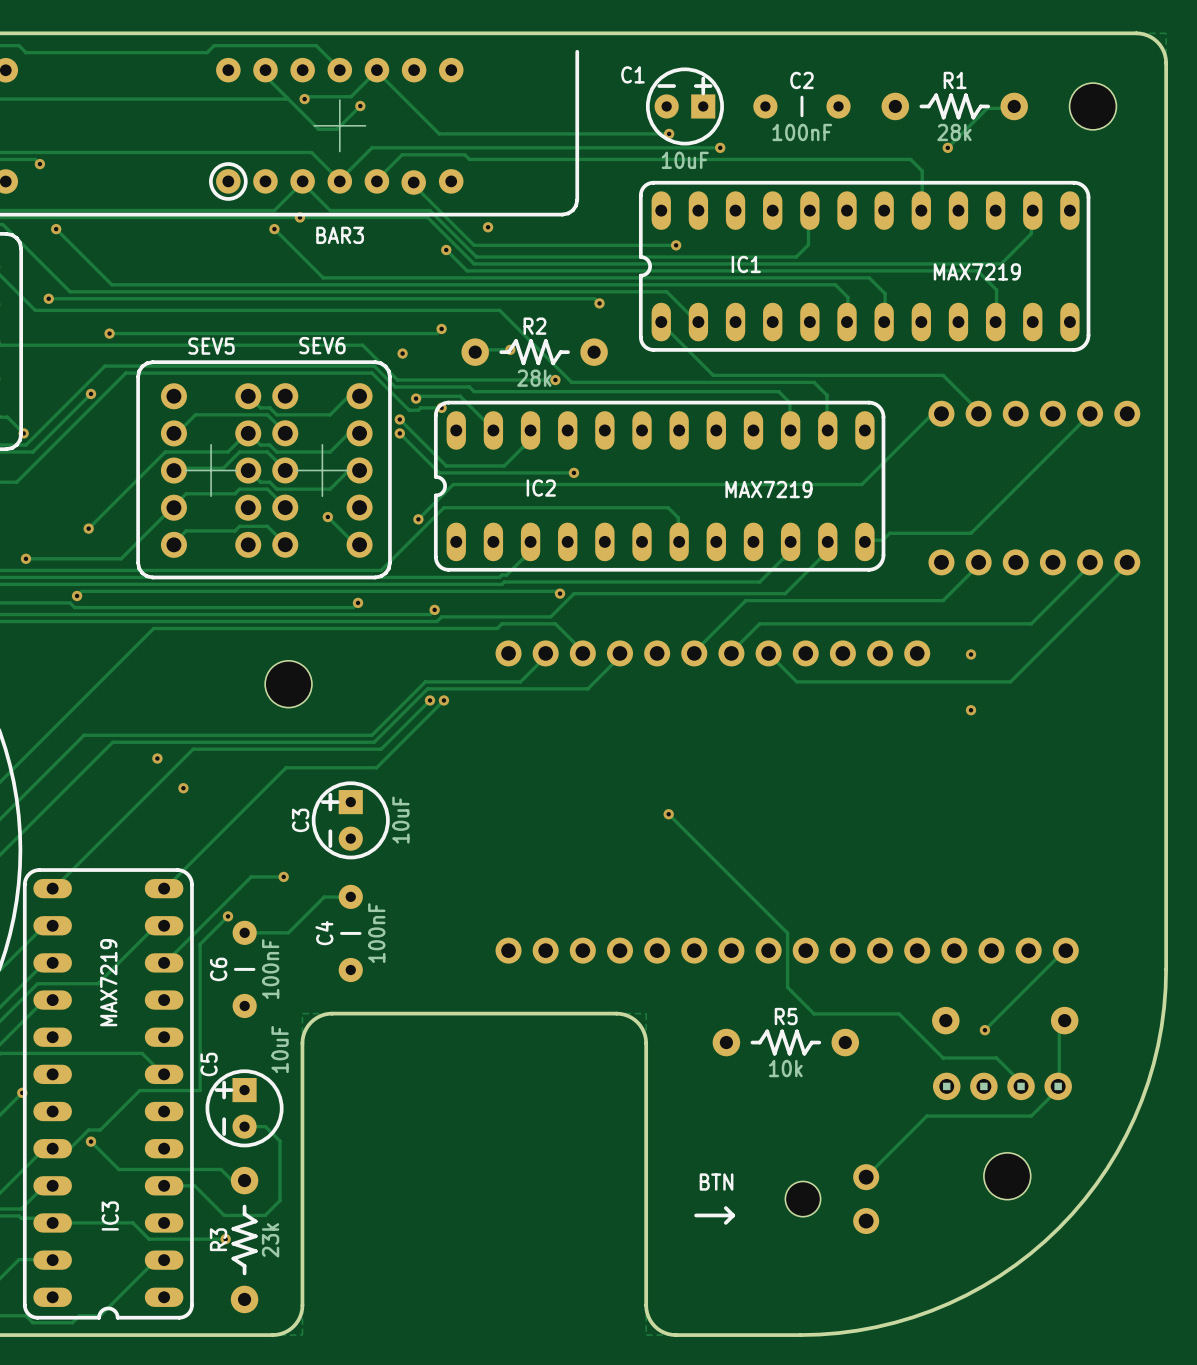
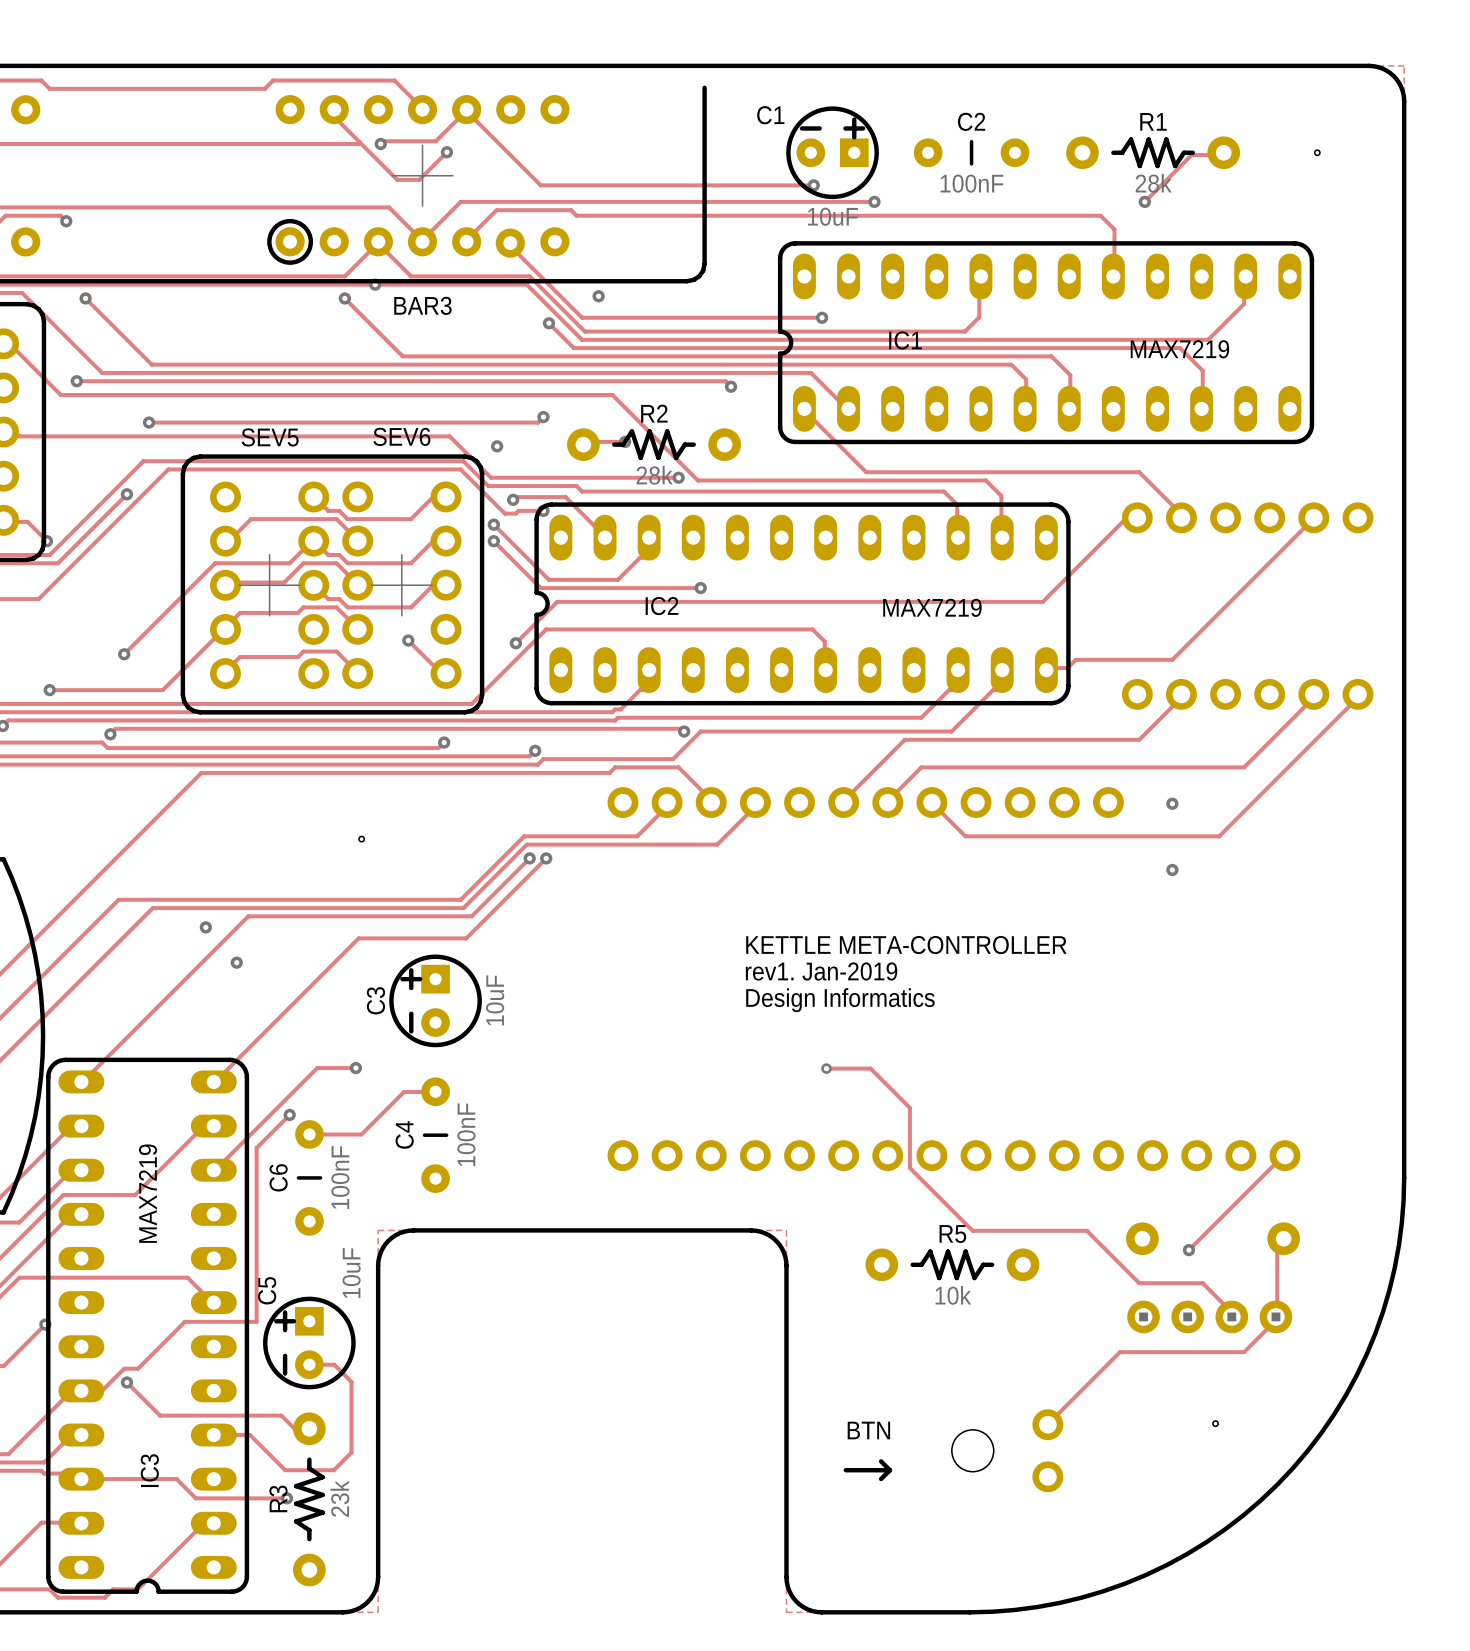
hole size: [1069, 83, 1117, 130] -> [1314, 150, 1320, 156]
hole size: [265, 660, 312, 708] -> [358, 836, 365, 842]
text: none -> KETTLE META-CONTROLLER (906, 945)
text: none -> rev1. Jan-2019 (821, 971)
track: (668, 814) (787, 933) (787, 987) (814, 1013) -> (826, 1068) (870, 1068) (909, 1107) (909, 1168) (972, 1230) (985, 1230)
via: (668, 814) -> none
text: none -> Design Informatics (840, 1000)
via: none -> (826, 1068)
hole size: [983, 1152, 1031, 1200] -> [1212, 1421, 1219, 1427]

